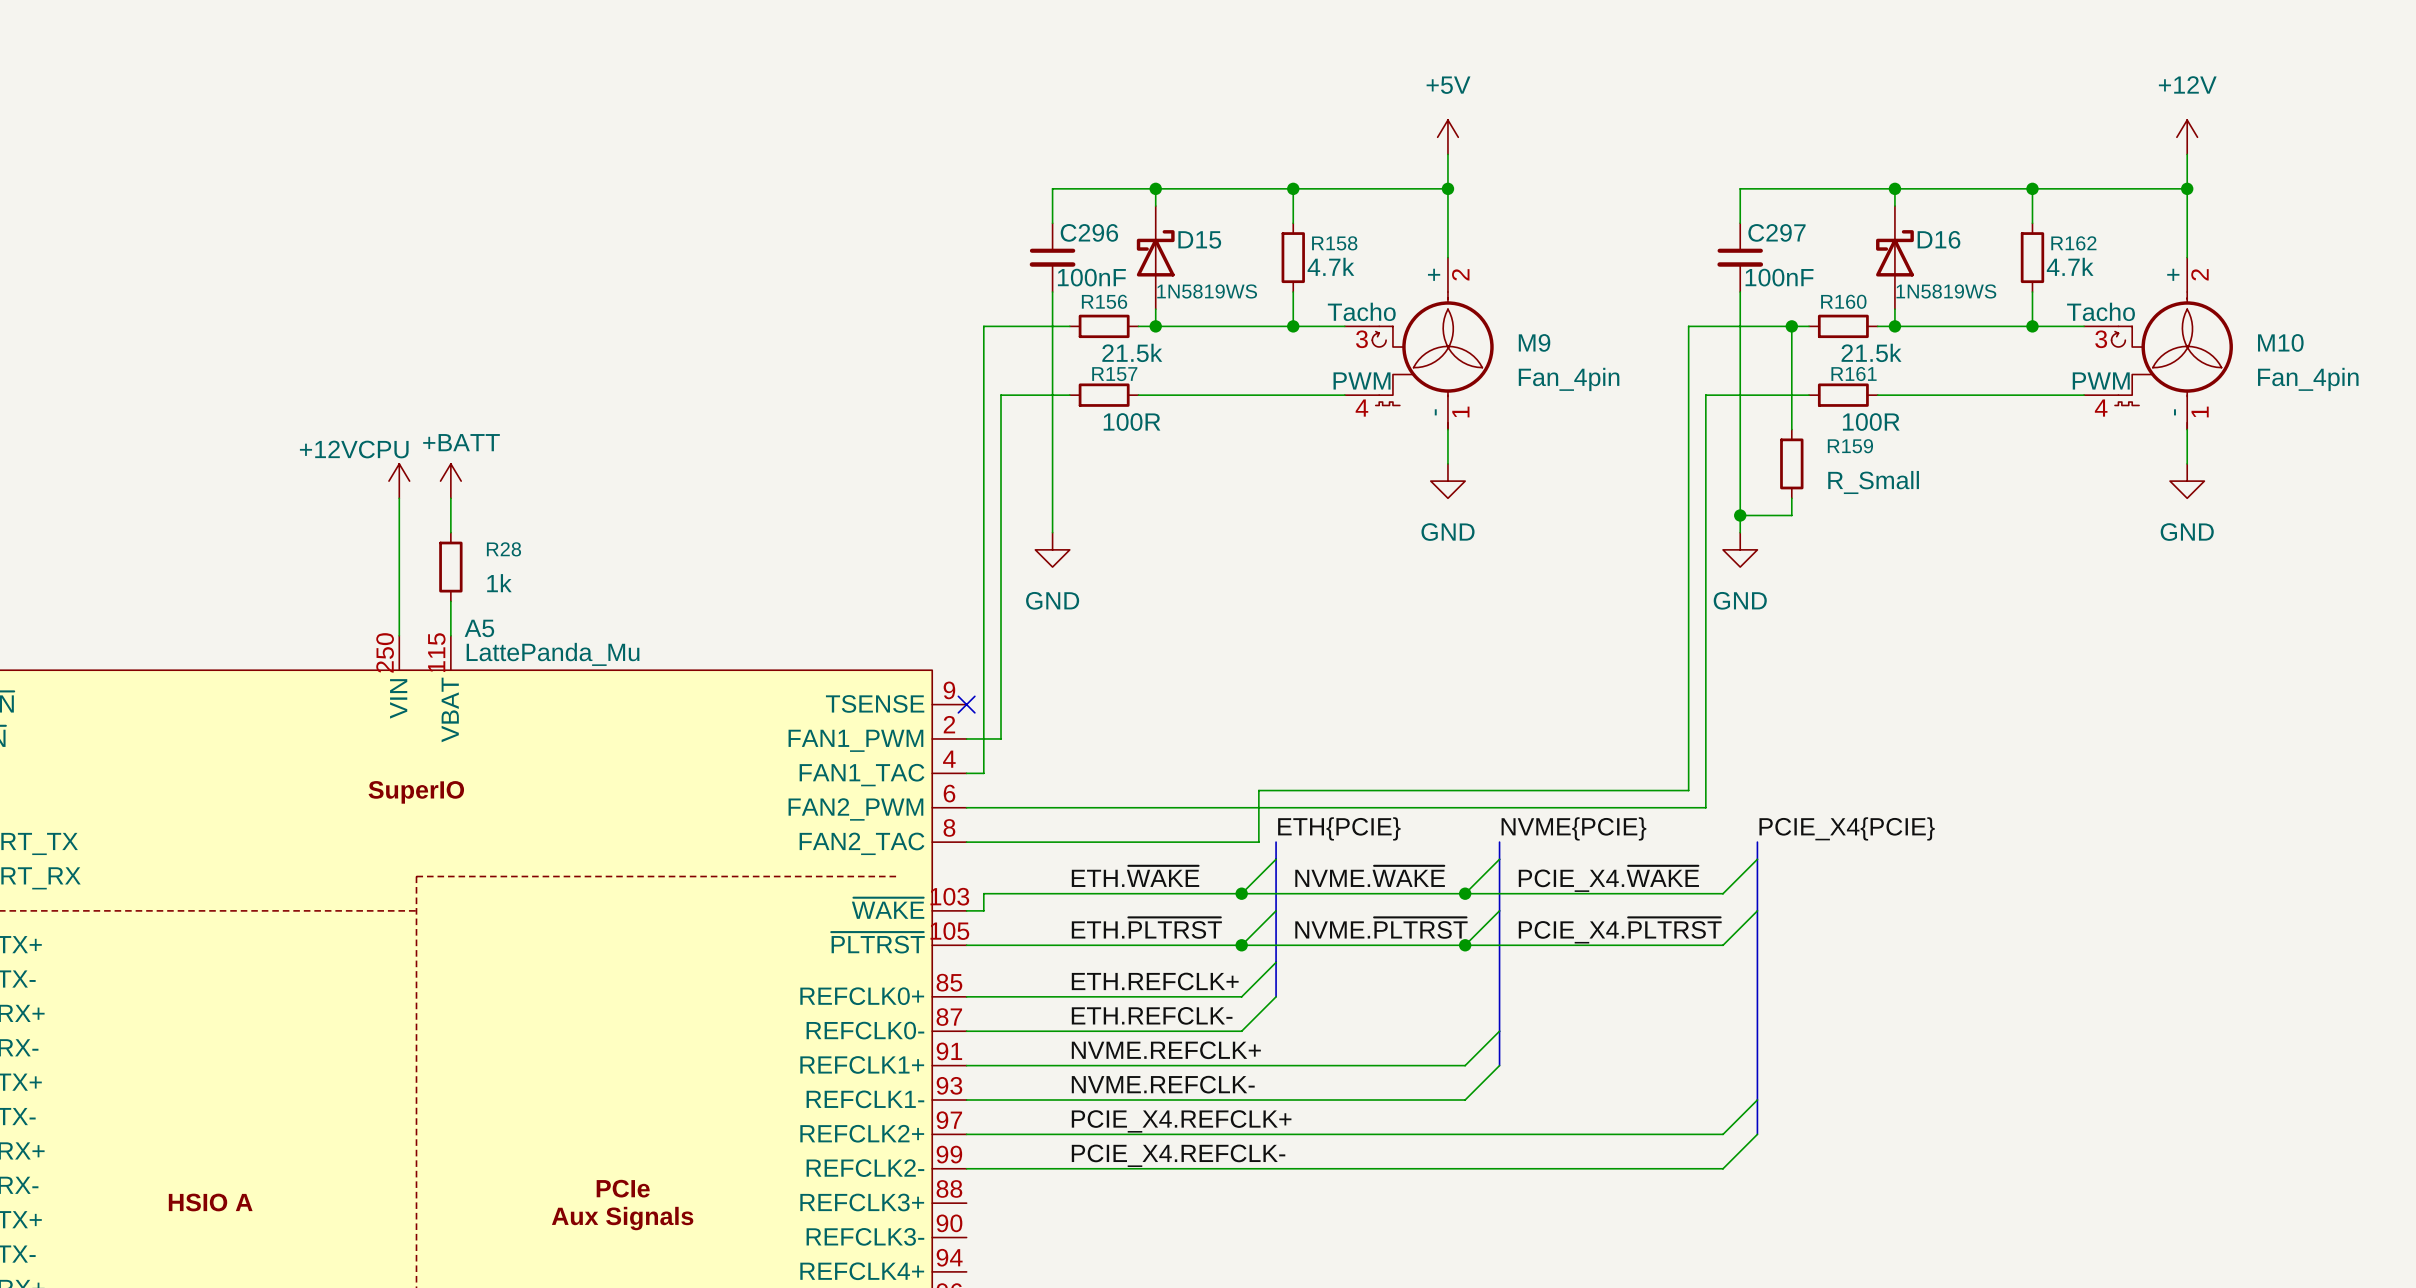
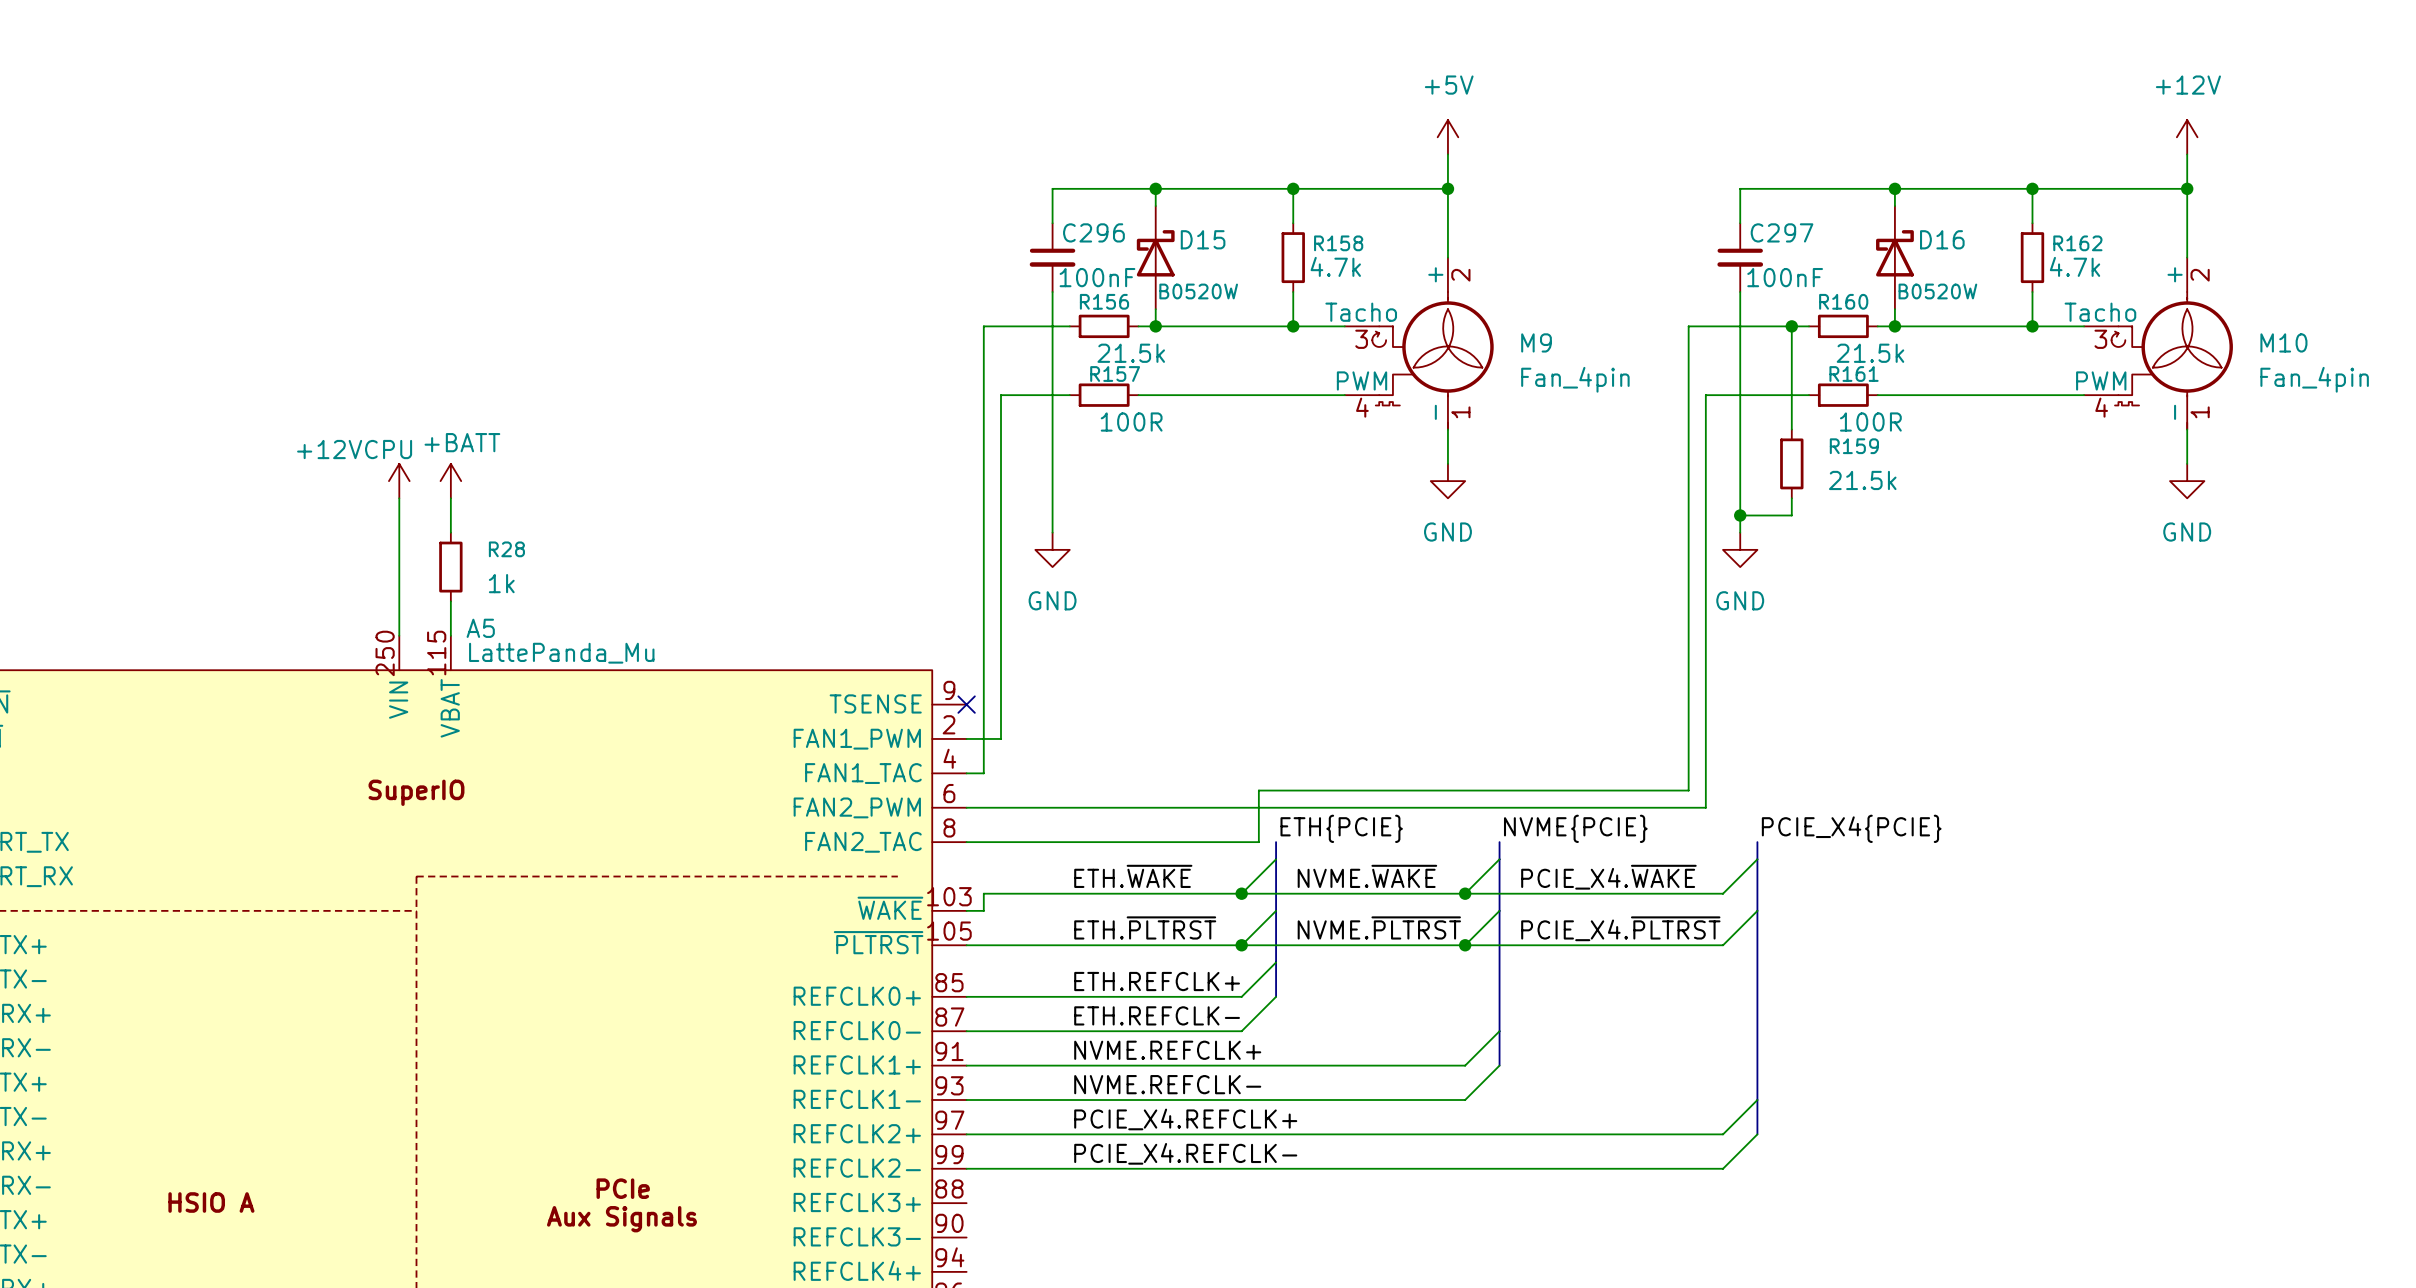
D15 value: 1N5819WS (1207, 291) -> B0520W (1198, 291)
D16 value: 1N5819WS (1946, 291) -> B0520W (1937, 291)
R159 value: R_Small (1873, 482) -> 21.5k (1862, 480)

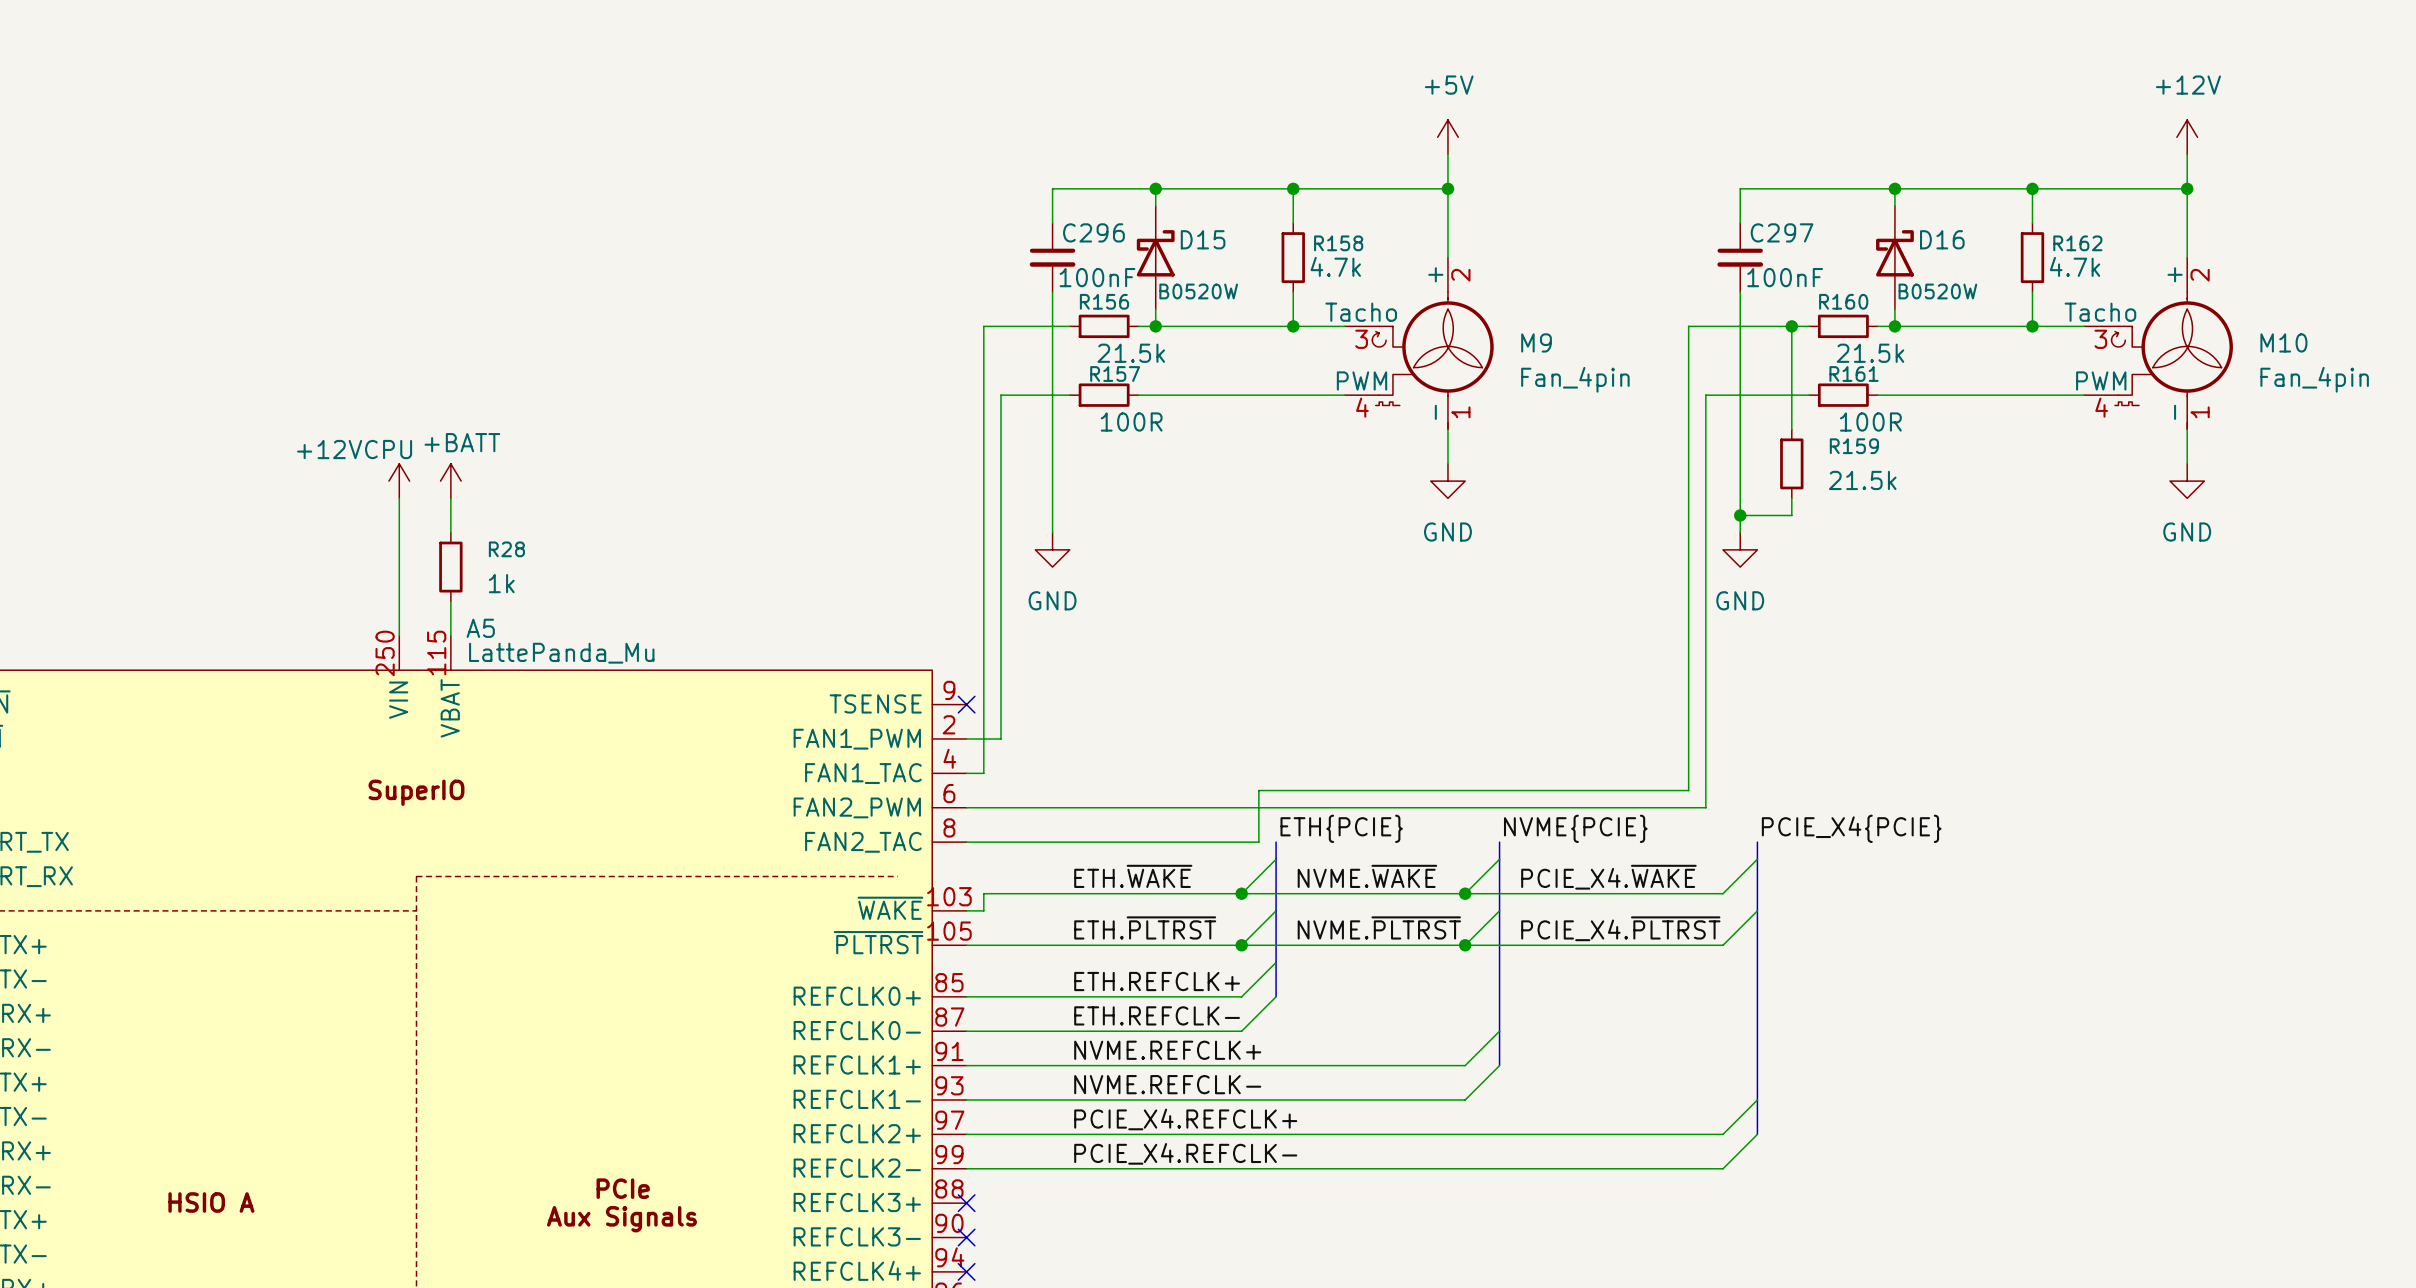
no-connect mark: none -> (966, 1203)
no-connect mark: none -> (966, 1237)
no-connect mark: none -> (966, 1271)

